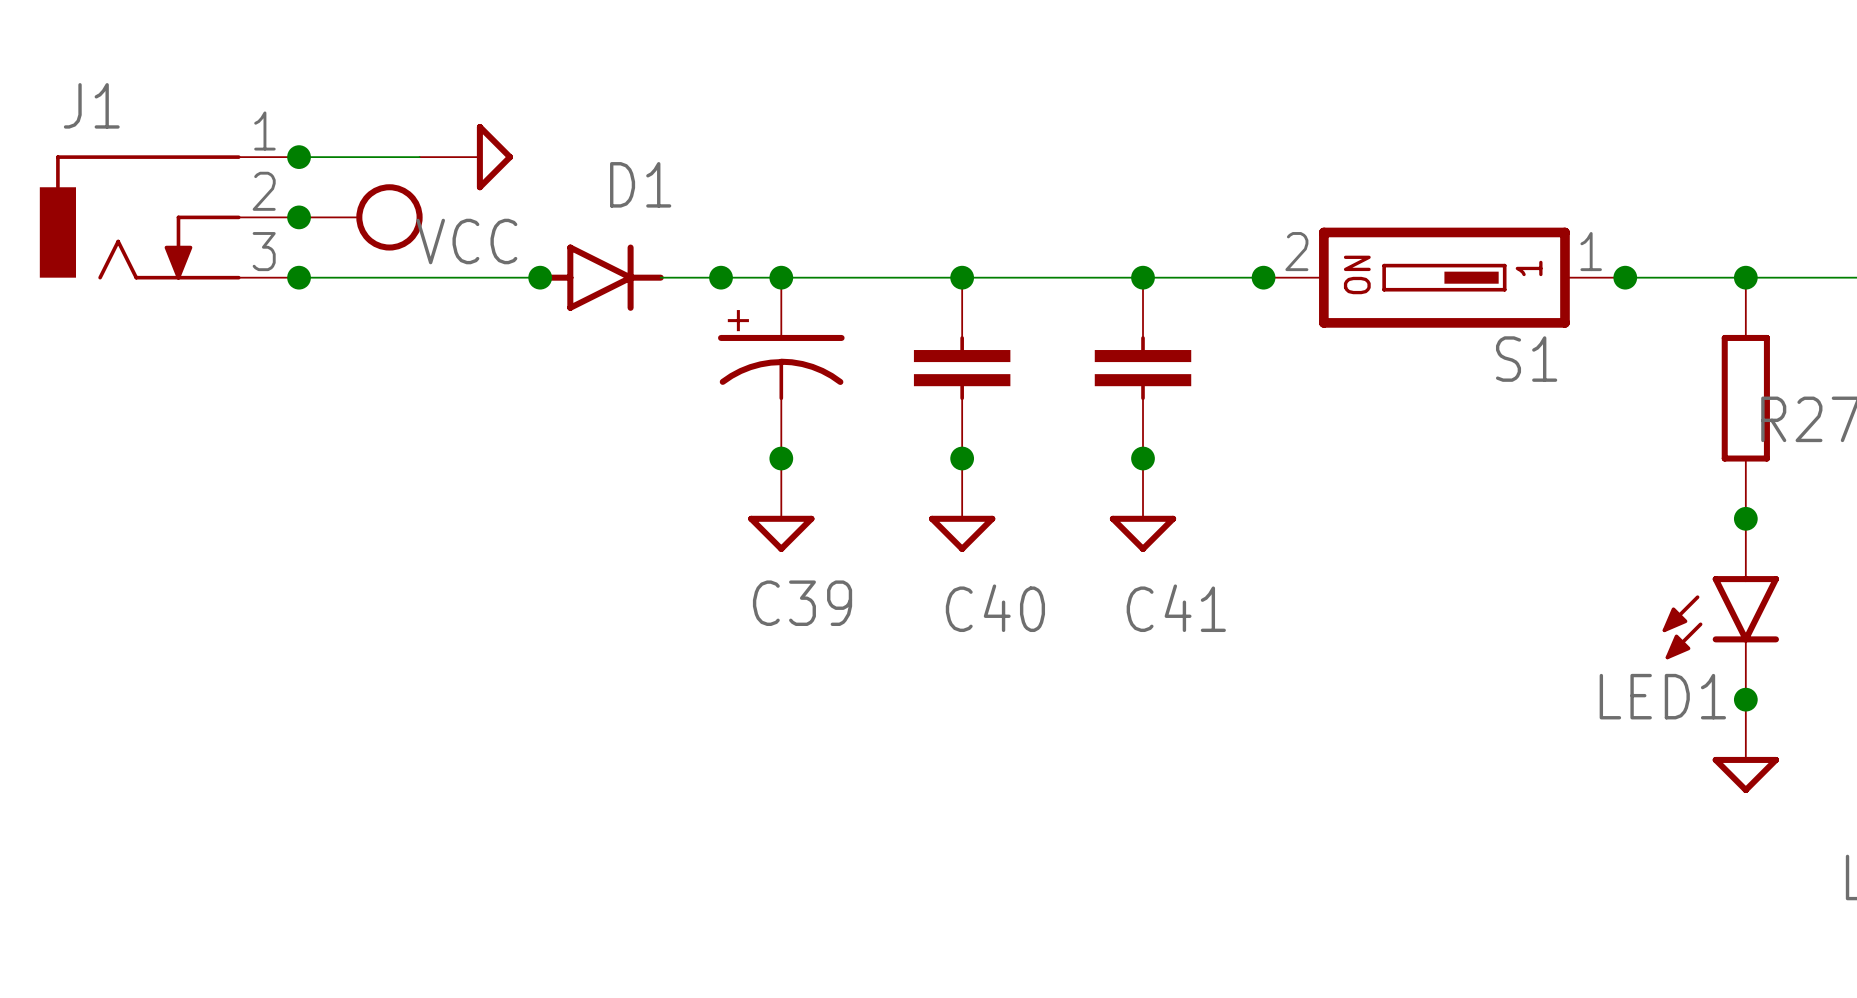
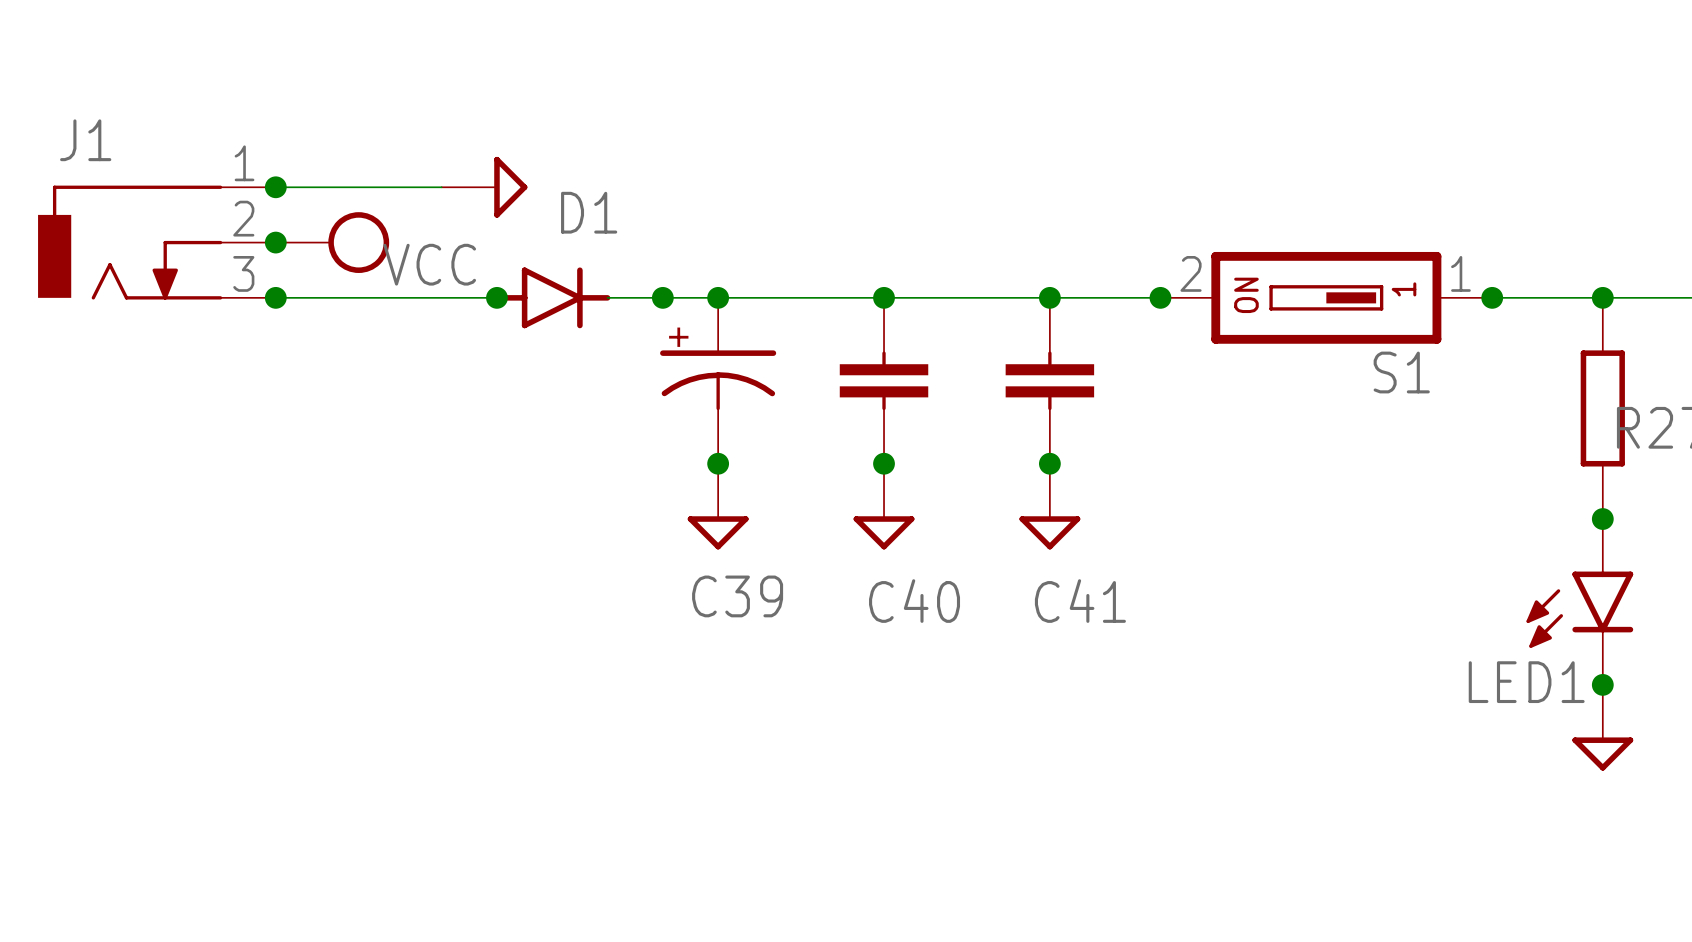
power symbol position: (466, 157) -> (484, 187)

